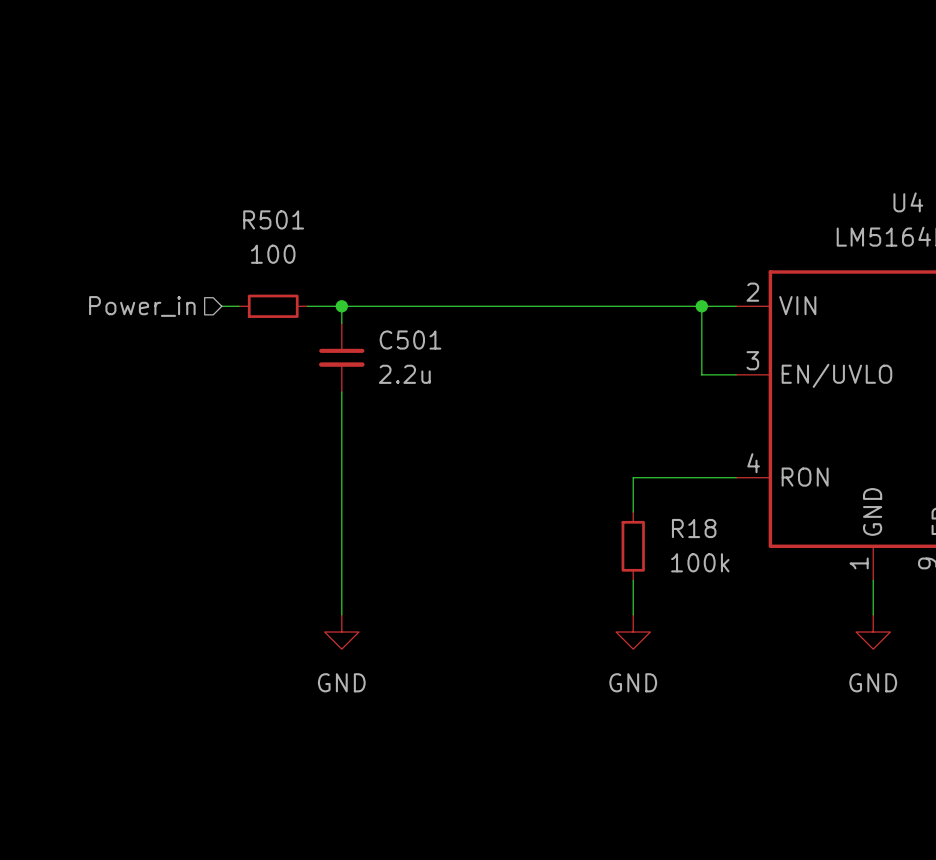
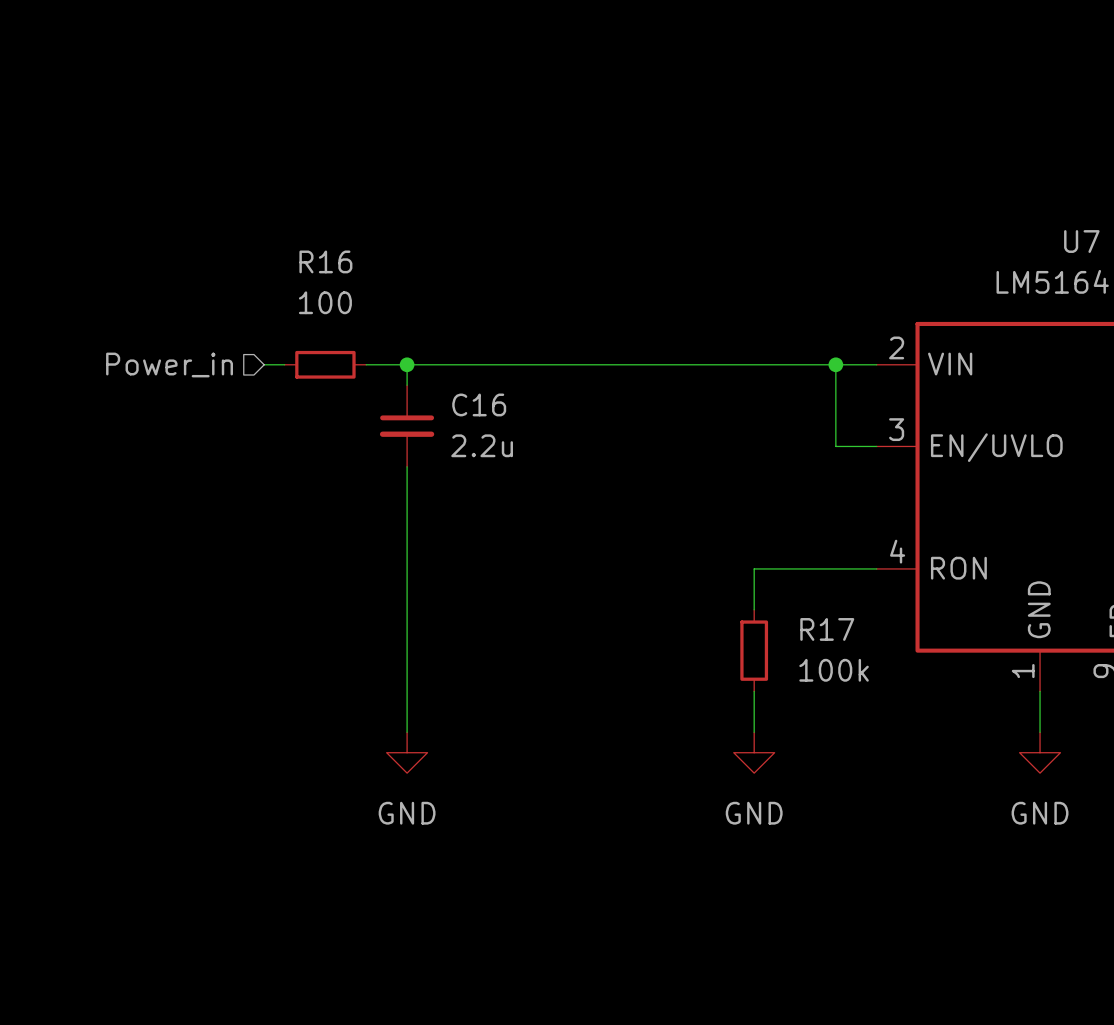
U4 name: U4 (908, 202) -> U7 (1081, 241)
R501 name: R501 (273, 219) -> R16 (325, 261)
C501 name: C501 (410, 340) -> C16 (479, 404)
R18 name: R18 (694, 528) -> R17 (827, 629)

